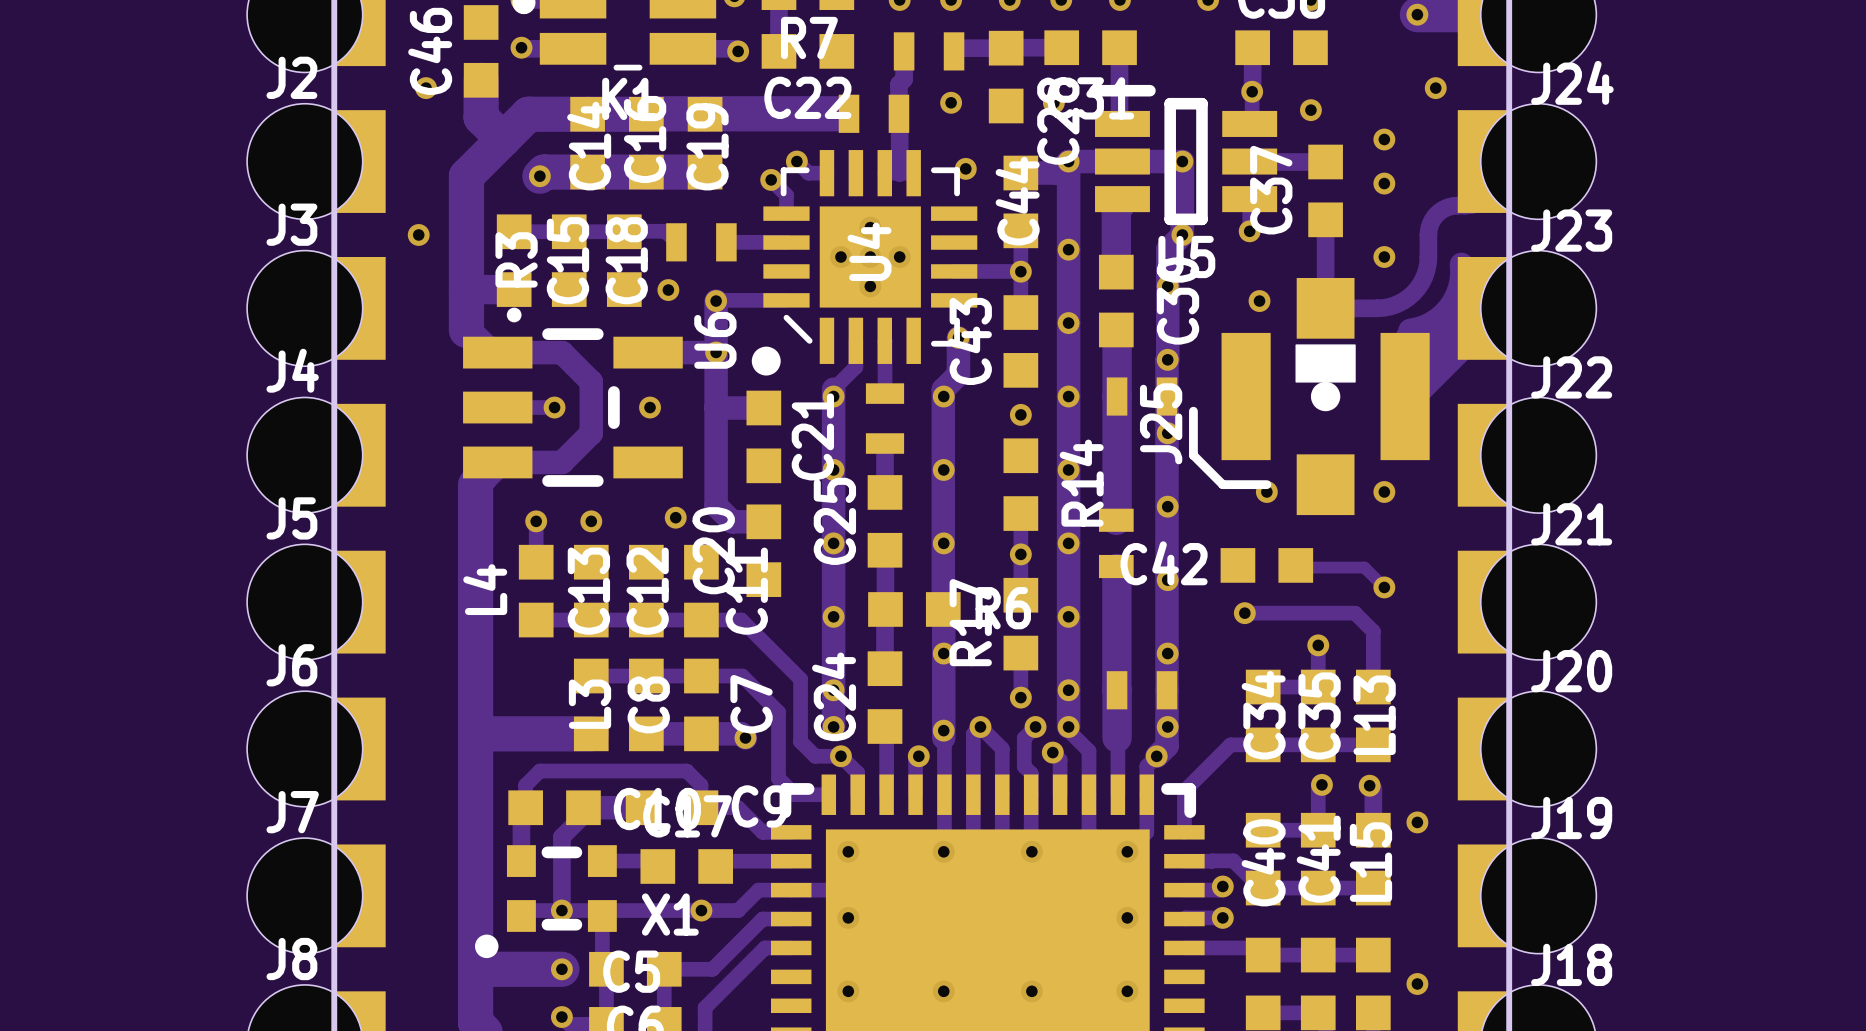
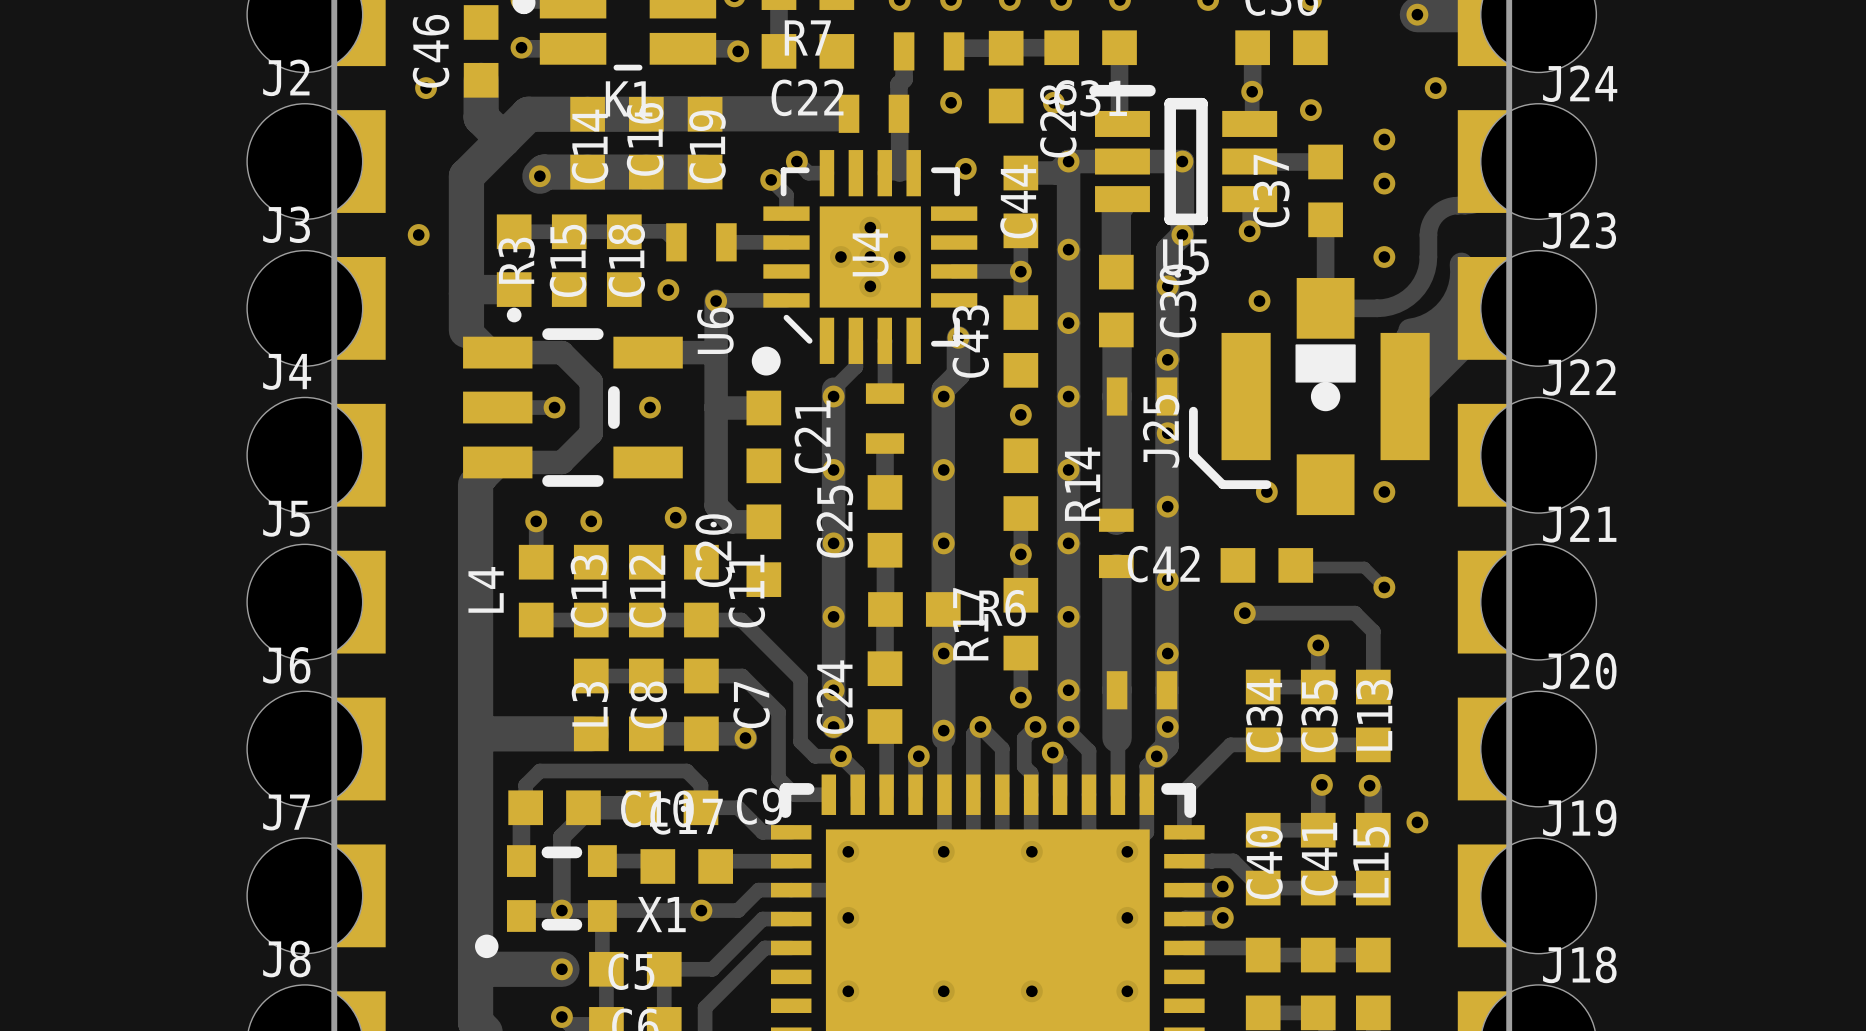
via: (716, 352) -> none
via: (1417, 983) -> none

